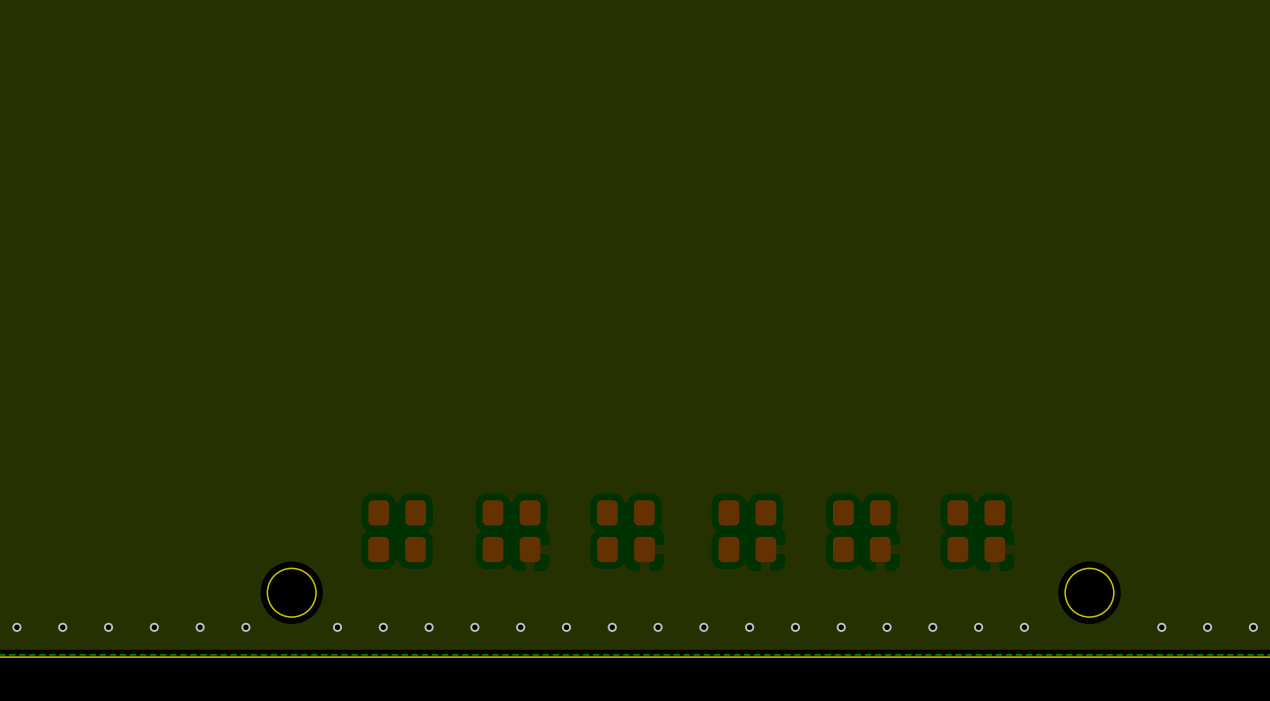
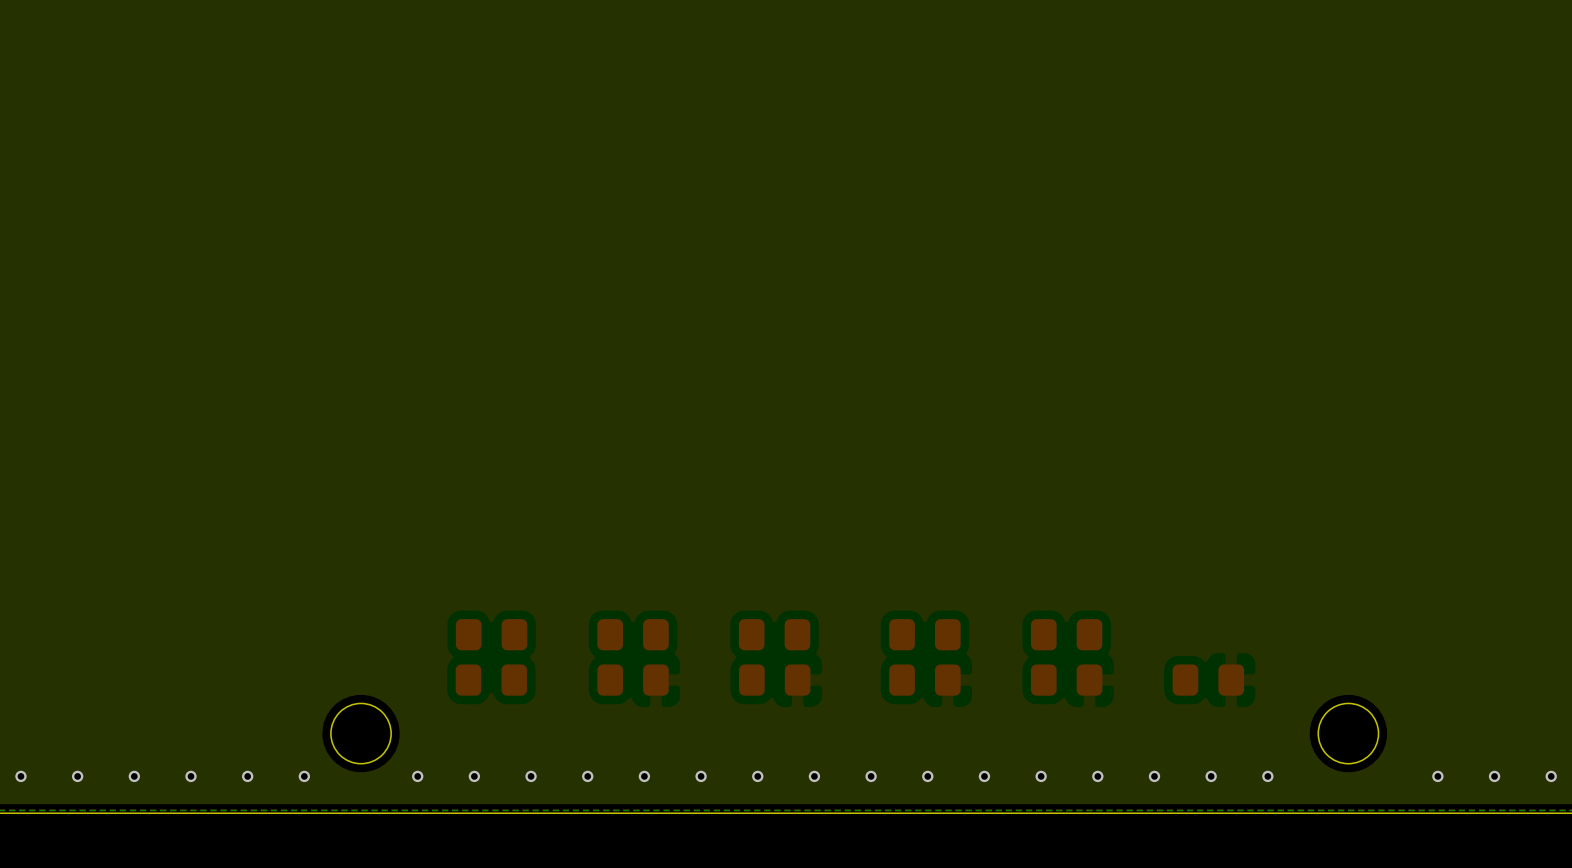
part: (976, 512) -> none

